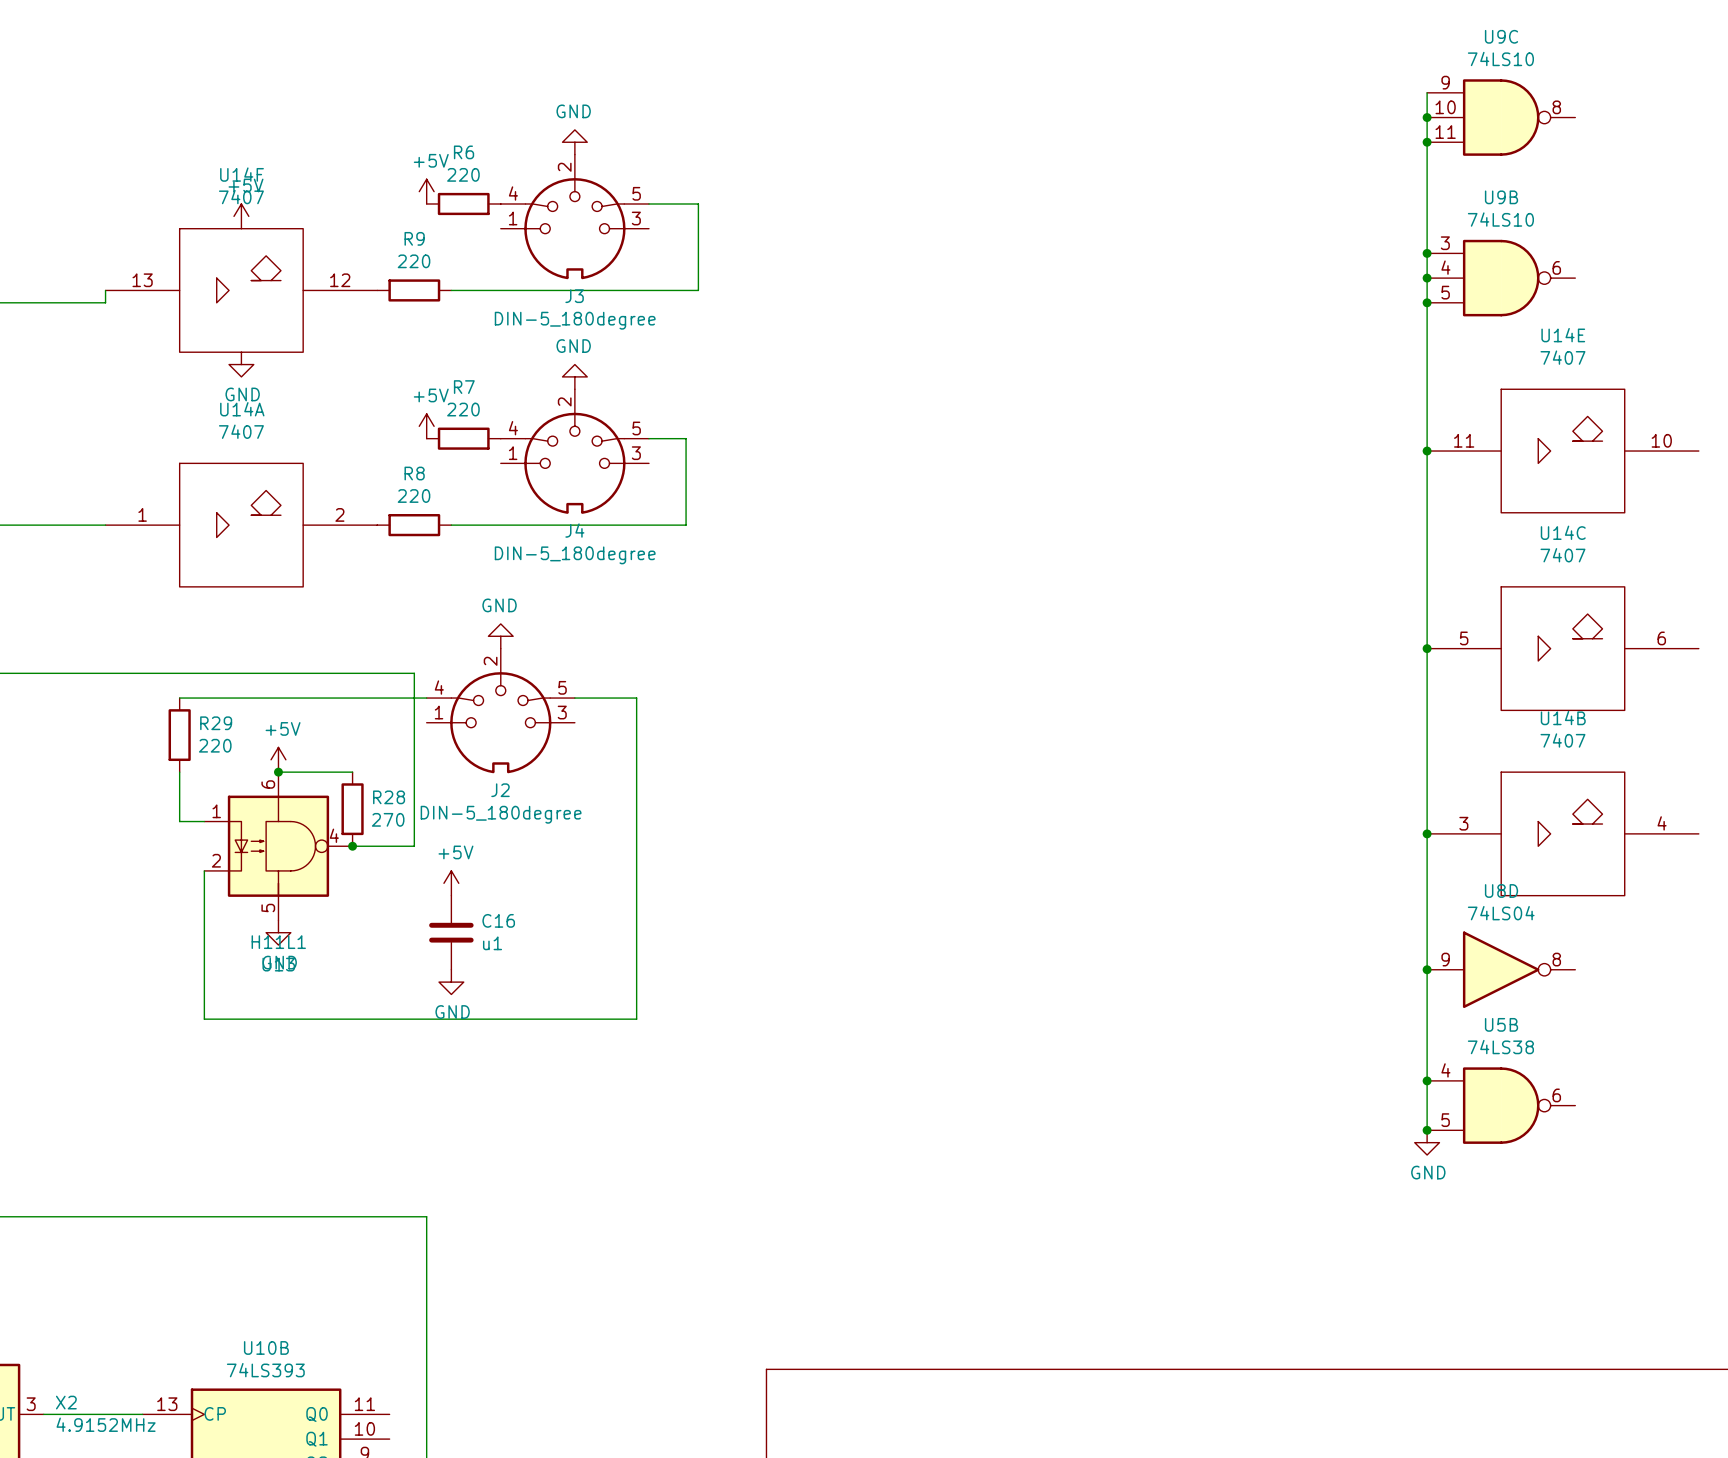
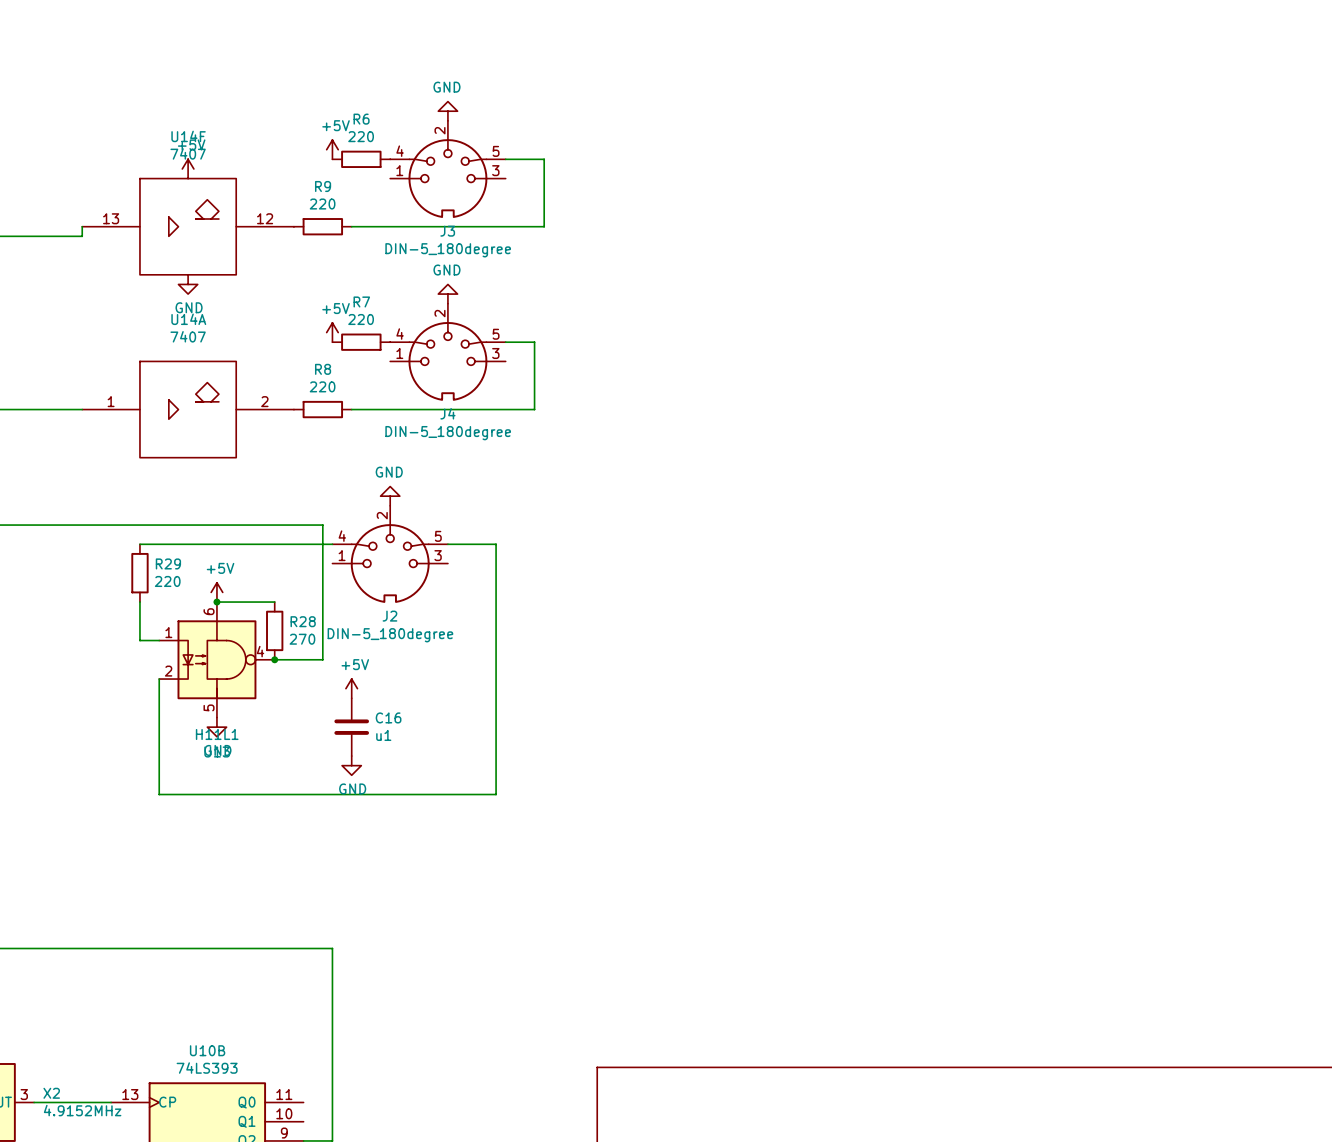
wire: (1427, 92) (1427, 1130) -> none
junction: (1427, 117) -> none
U9C: 74LS10 (1501, 117) -> none
junction: (1427, 142) -> none
junction: (1427, 253) -> none
junction: (1427, 278) -> none
U9B: 74LS10 (1501, 278) -> none
junction: (1427, 302) -> none
junction: (1427, 451) -> none
U14E: 7407 (1562, 451) -> none
junction: (1427, 648) -> none
U14C: 7407 (1562, 648) -> none
junction: (1427, 833) -> none
U14B: 7407 (1562, 833) -> none
junction: (1427, 969) -> none
U8D: 74LS04 (1501, 969) -> none
junction: (1427, 1080) -> none
U5B: 74LS38 (1501, 1105) -> none
junction: (1427, 1130) -> none
power symbol: GND (1427, 1142) -> none

